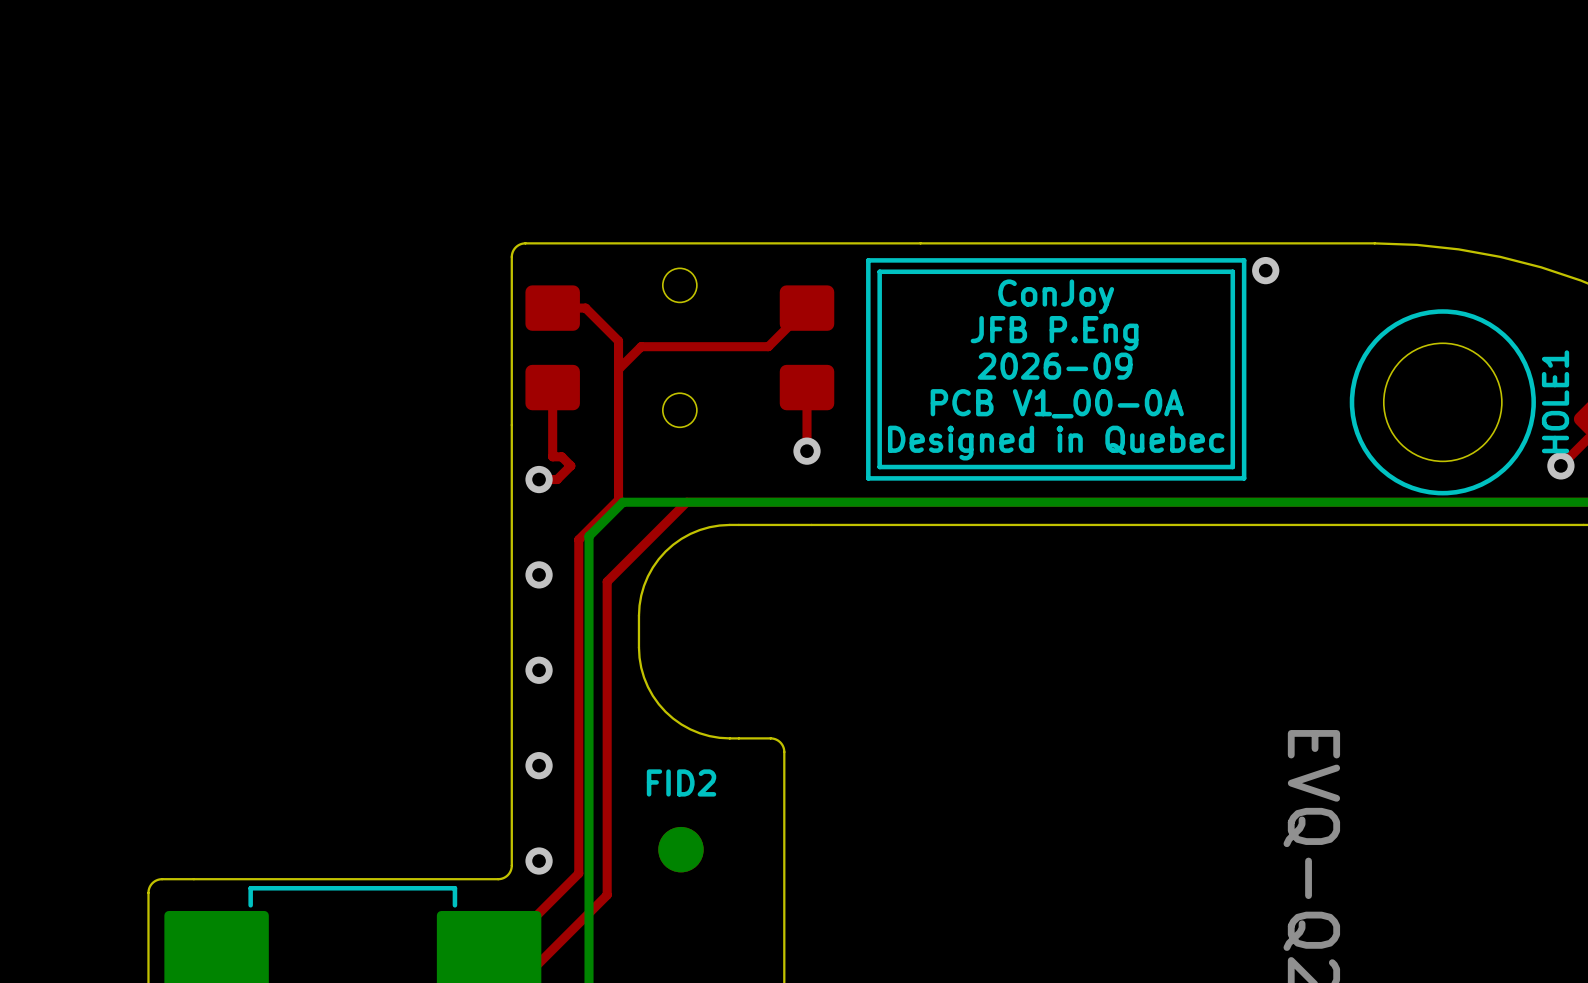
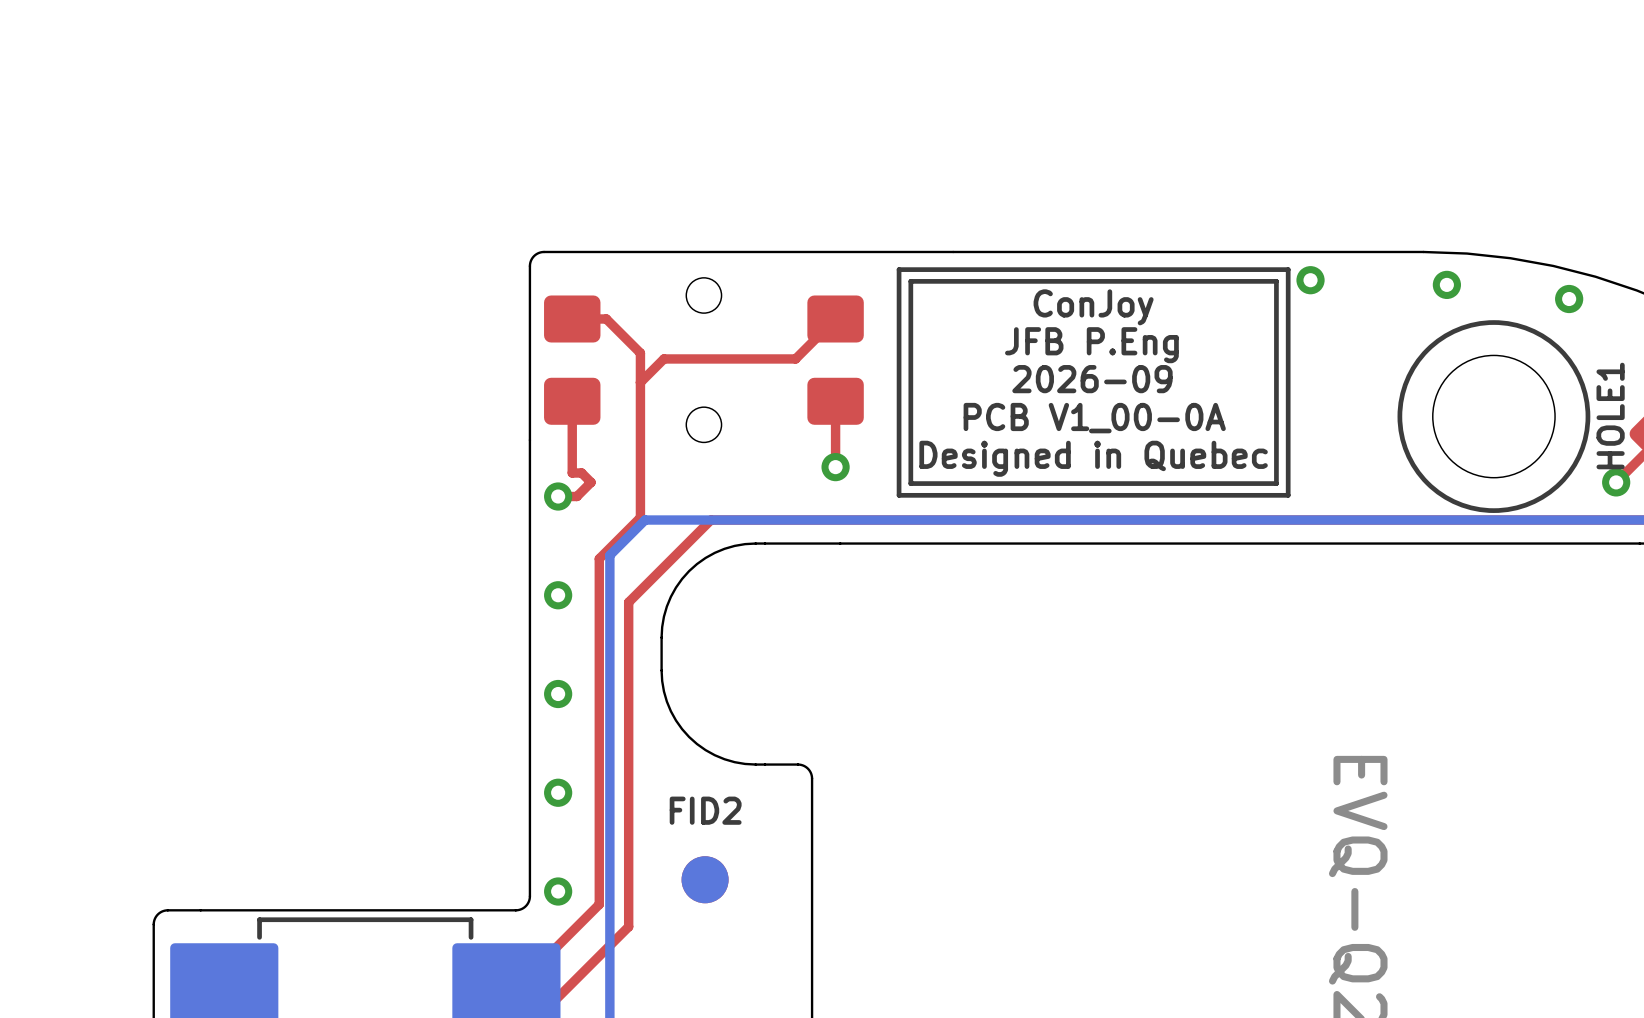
via: none -> (1446, 284)
via: none -> (1569, 299)

